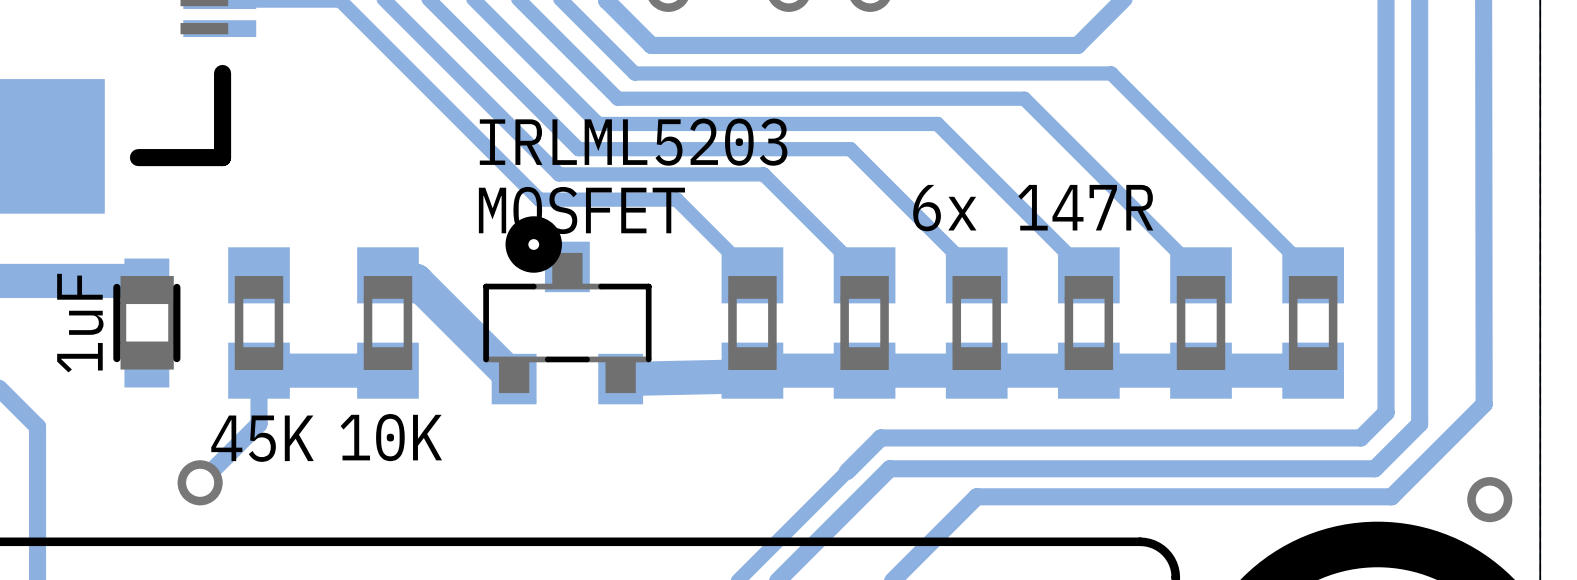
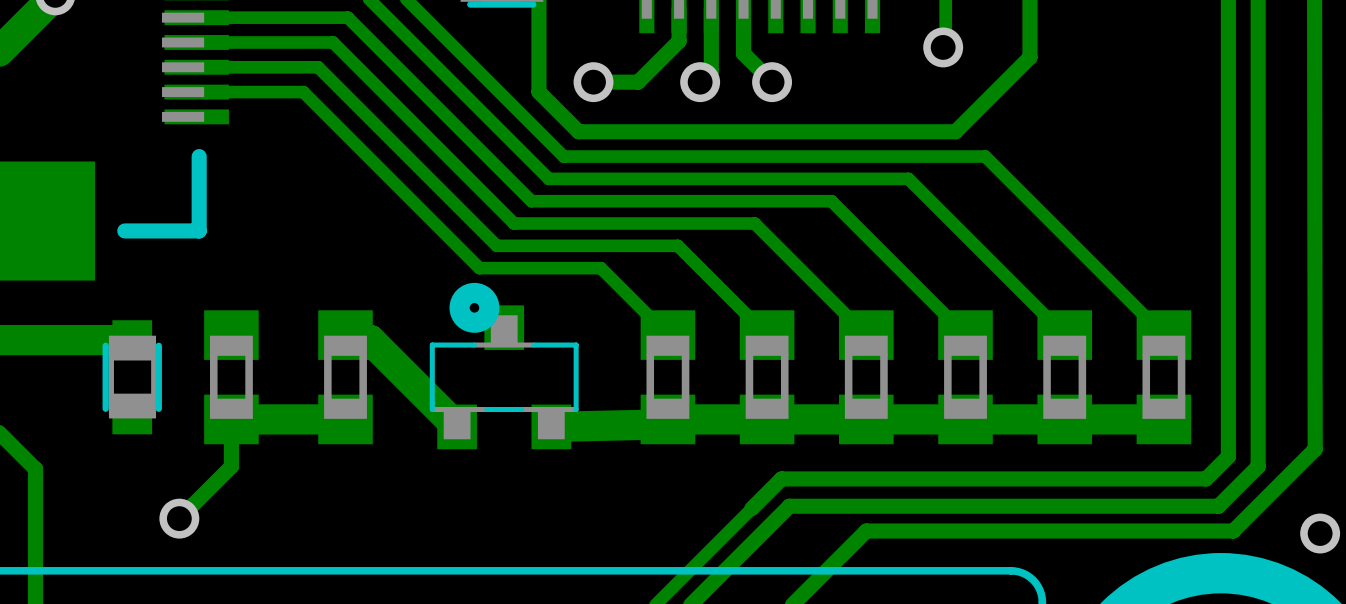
text: IRLML5203 (633, 142) -> none
text: 6x 147R (1033, 208) -> none
text: MOSFET (581, 210) -> none
text: 1uF (80, 323) -> none
text: 10K (391, 437) -> none
text: 45K (262, 438) -> none

